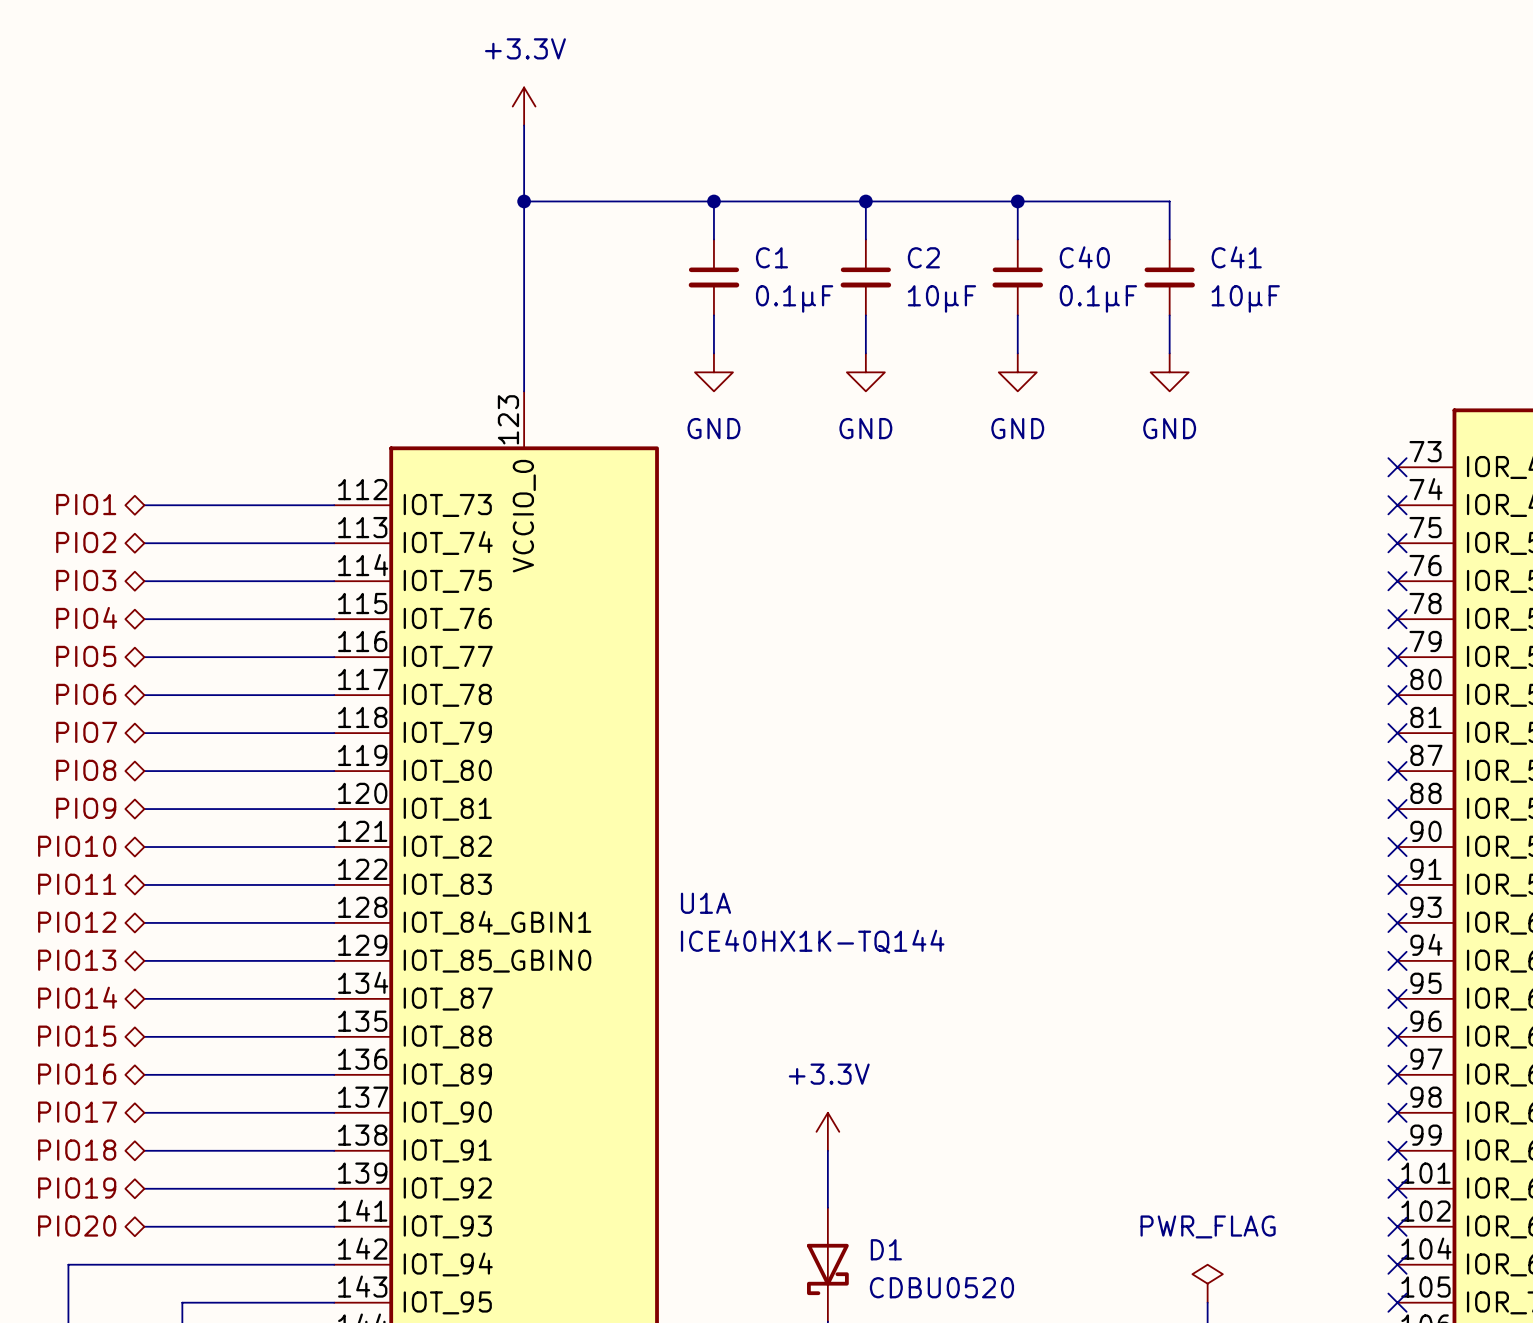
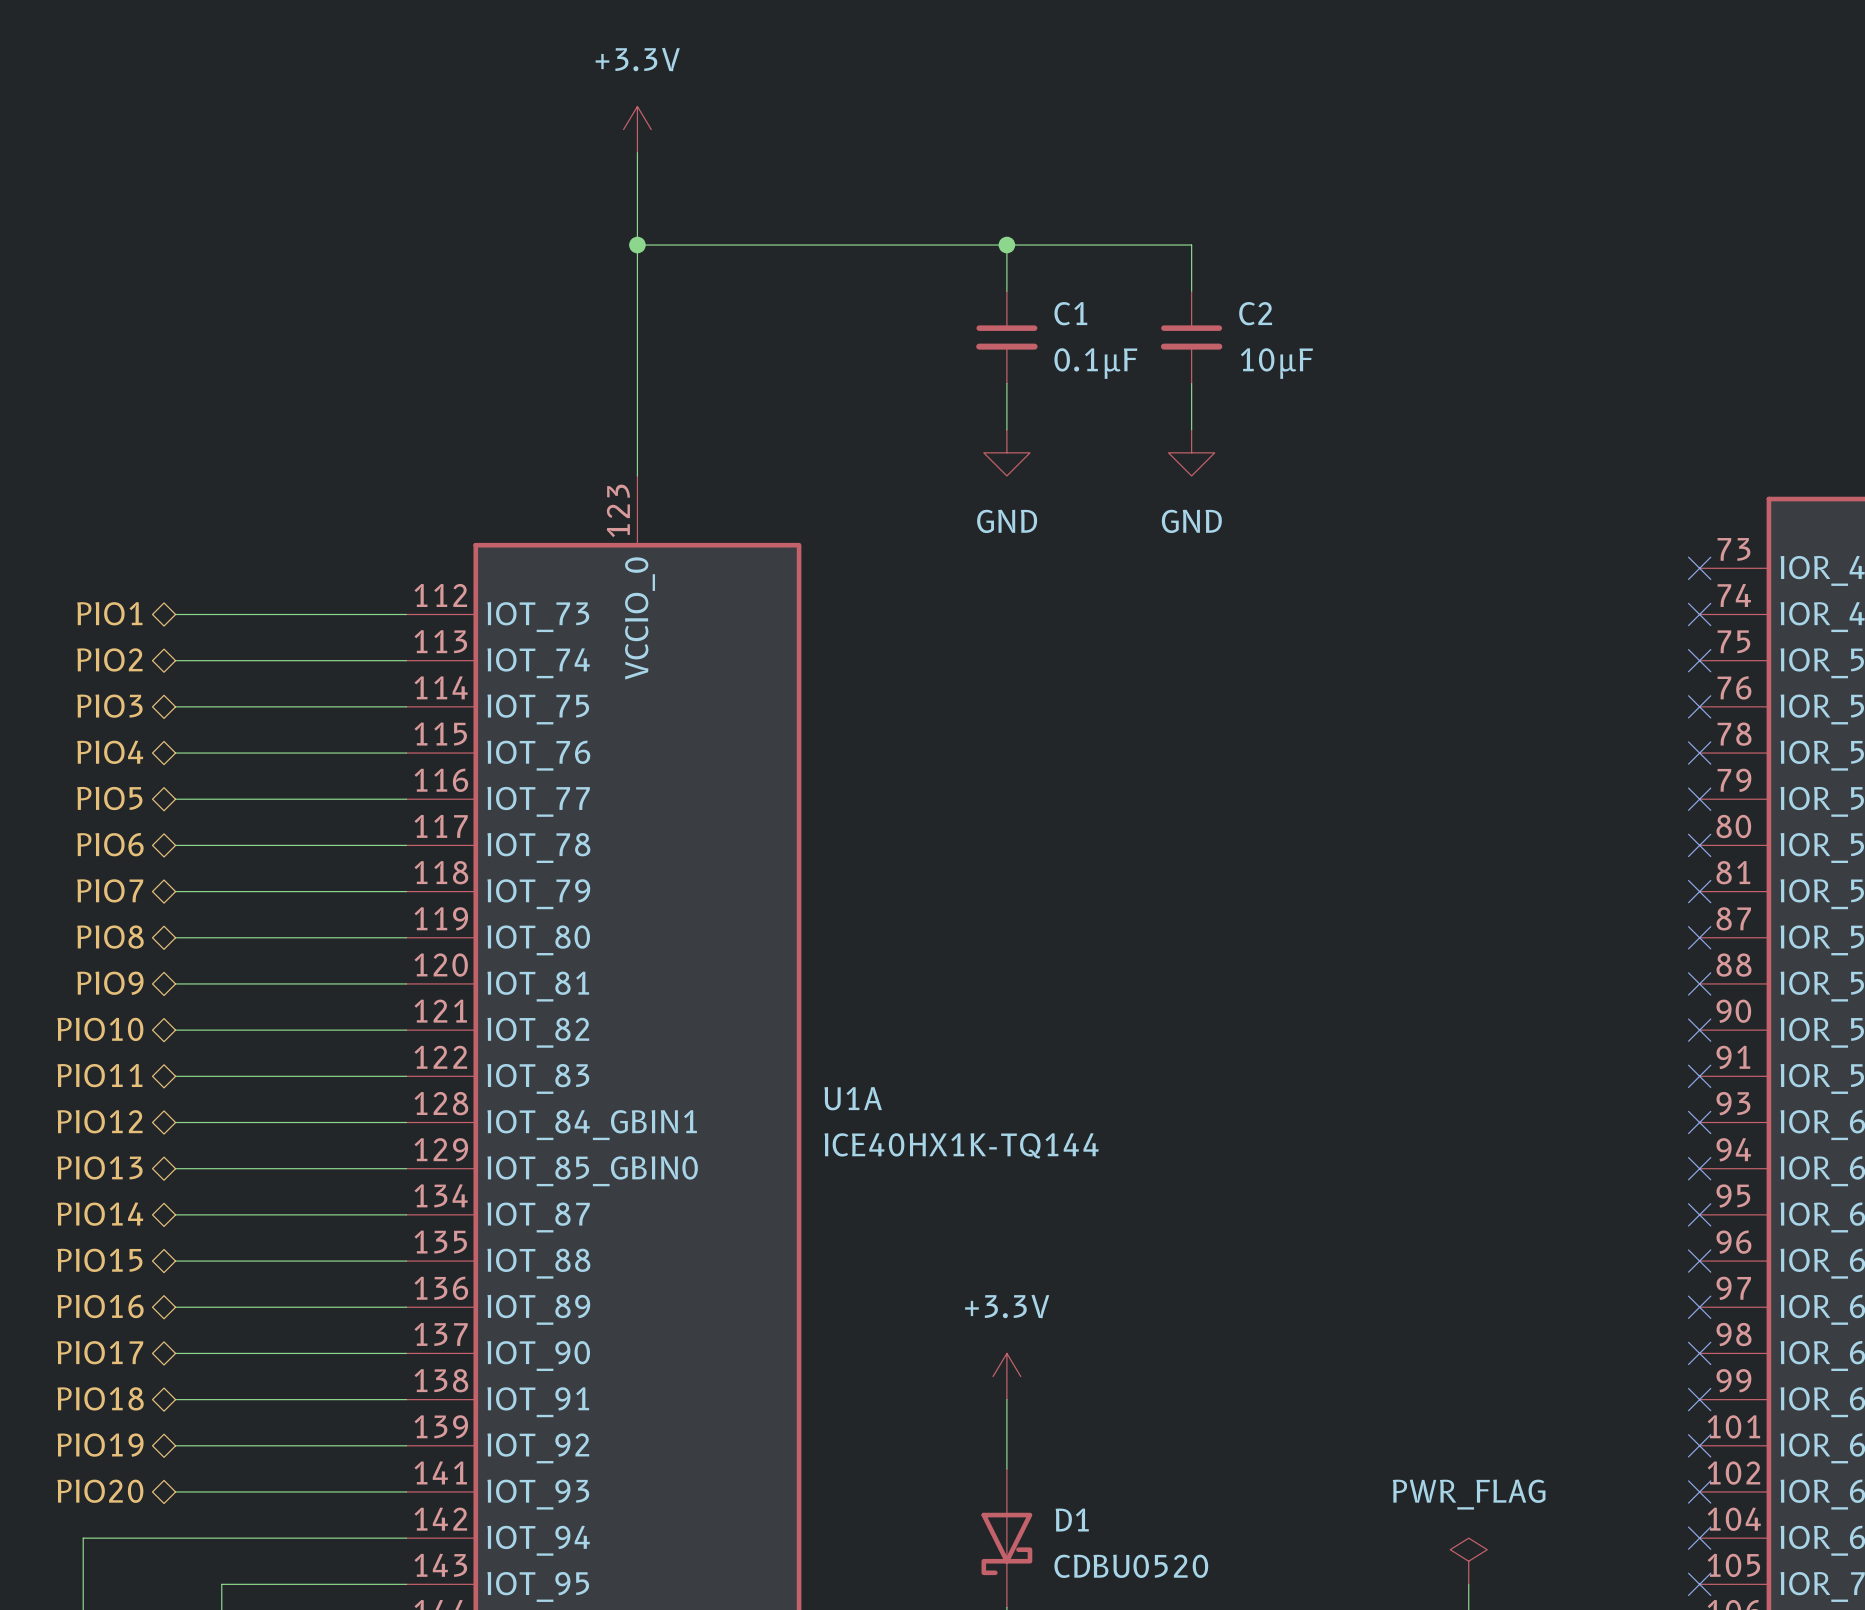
wire: (713, 201) (713, 239) -> none
junction: (713, 201) -> none
wire: (865, 201) (865, 239) -> (1006, 245) (1006, 291)
junction position: (865, 201) -> (1006, 245)
wire: (979, 201) (1169, 201) (1169, 239) -> (1191, 245) (1191, 291)
wire: (1017, 201) (1017, 239) -> none
junction: (1017, 201) -> none
C1 position: (713, 277) -> (1006, 337)
C2 position: (865, 277) -> (1191, 337)
C40: 0.1µF (1017, 277) -> none
C41: 10µF (1169, 277) -> none
wire: (713, 315) (713, 353) -> none
wire: (865, 315) (865, 353) -> (1006, 383) (1006, 429)
wire: (1017, 315) (1017, 353) -> (1191, 383) (1191, 429)
wire: (1169, 315) (1169, 353) -> none
power symbol: GND (713, 372) -> none
power symbol position: GND (865, 372) -> GND (1006, 452)
power symbol position: GND (1017, 372) -> GND (1191, 452)
power symbol: GND (1169, 372) -> none

